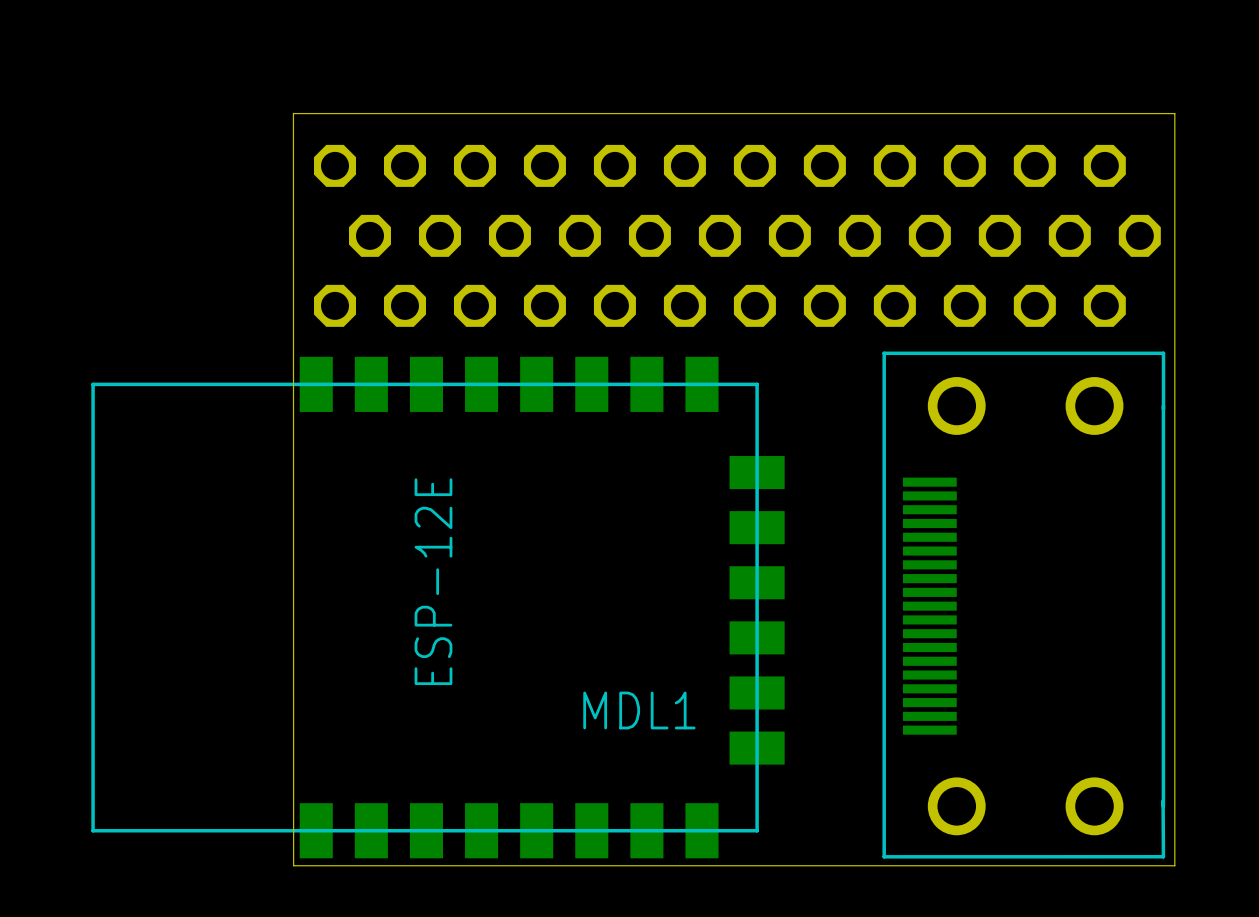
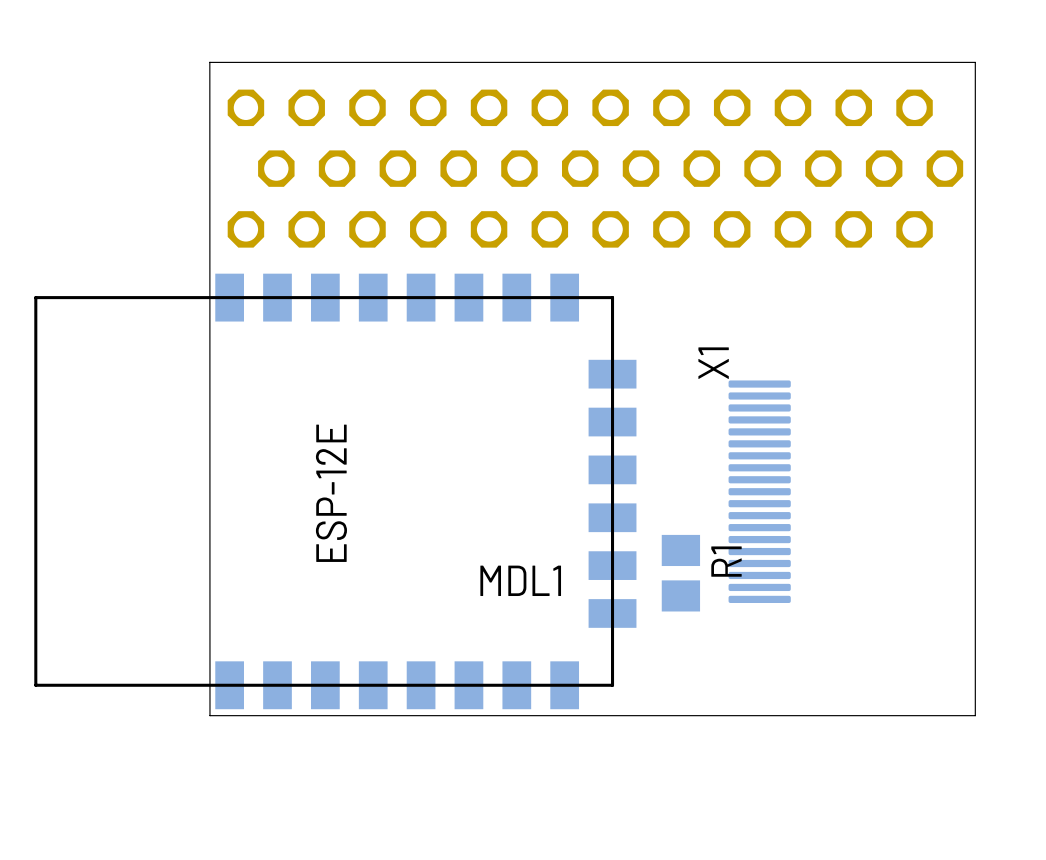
part: (1023, 605) -> none
part: none -> (759, 491)
R1: none -> (680, 573)

